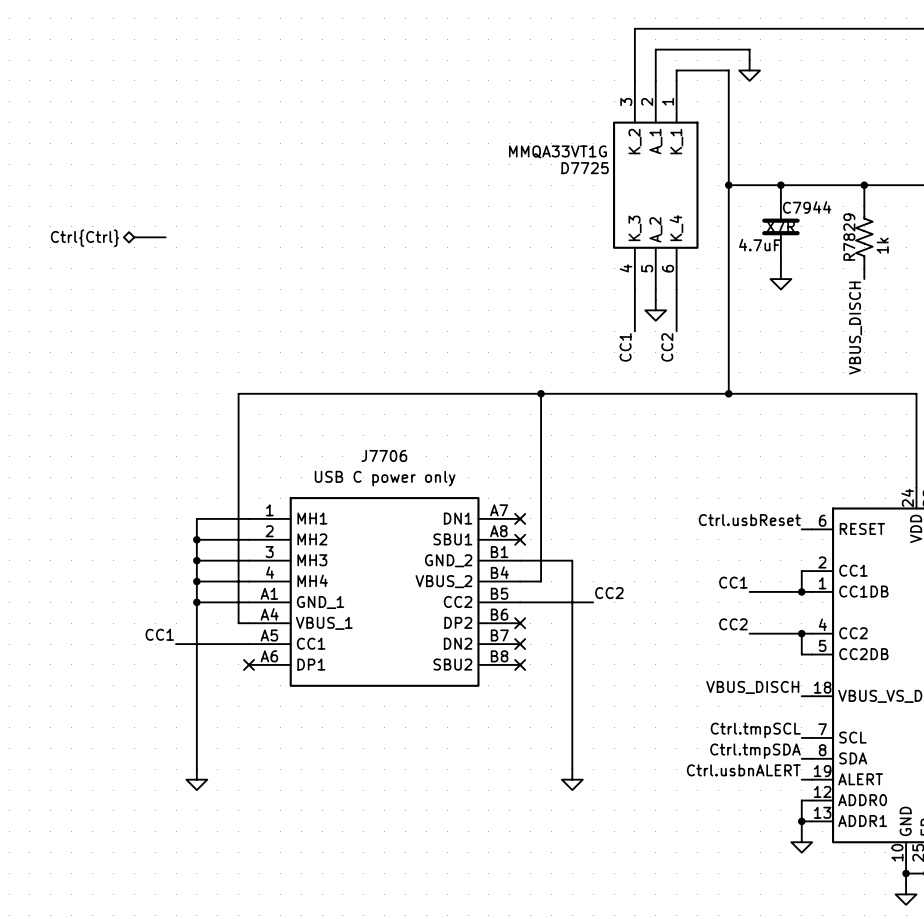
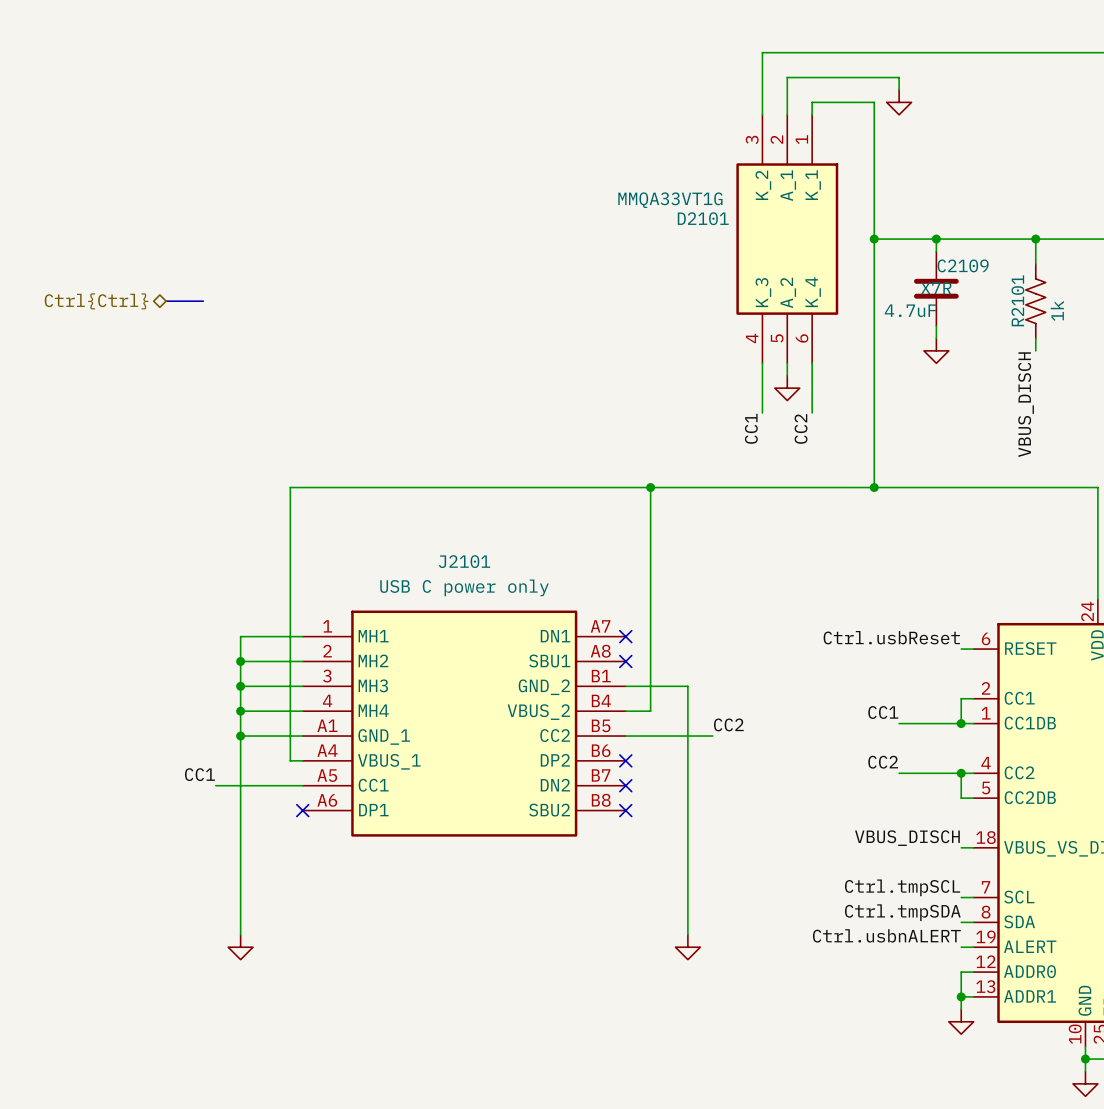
D7725 name: D7725 (585, 168) -> D2101 (703, 218)
C7944 name: C7944 (807, 207) -> C2109 (963, 265)
R7829 name: R7829 (849, 237) -> R2101 (1017, 300)
J7706 name: J7706 (384, 455) -> J2101 (464, 561)

